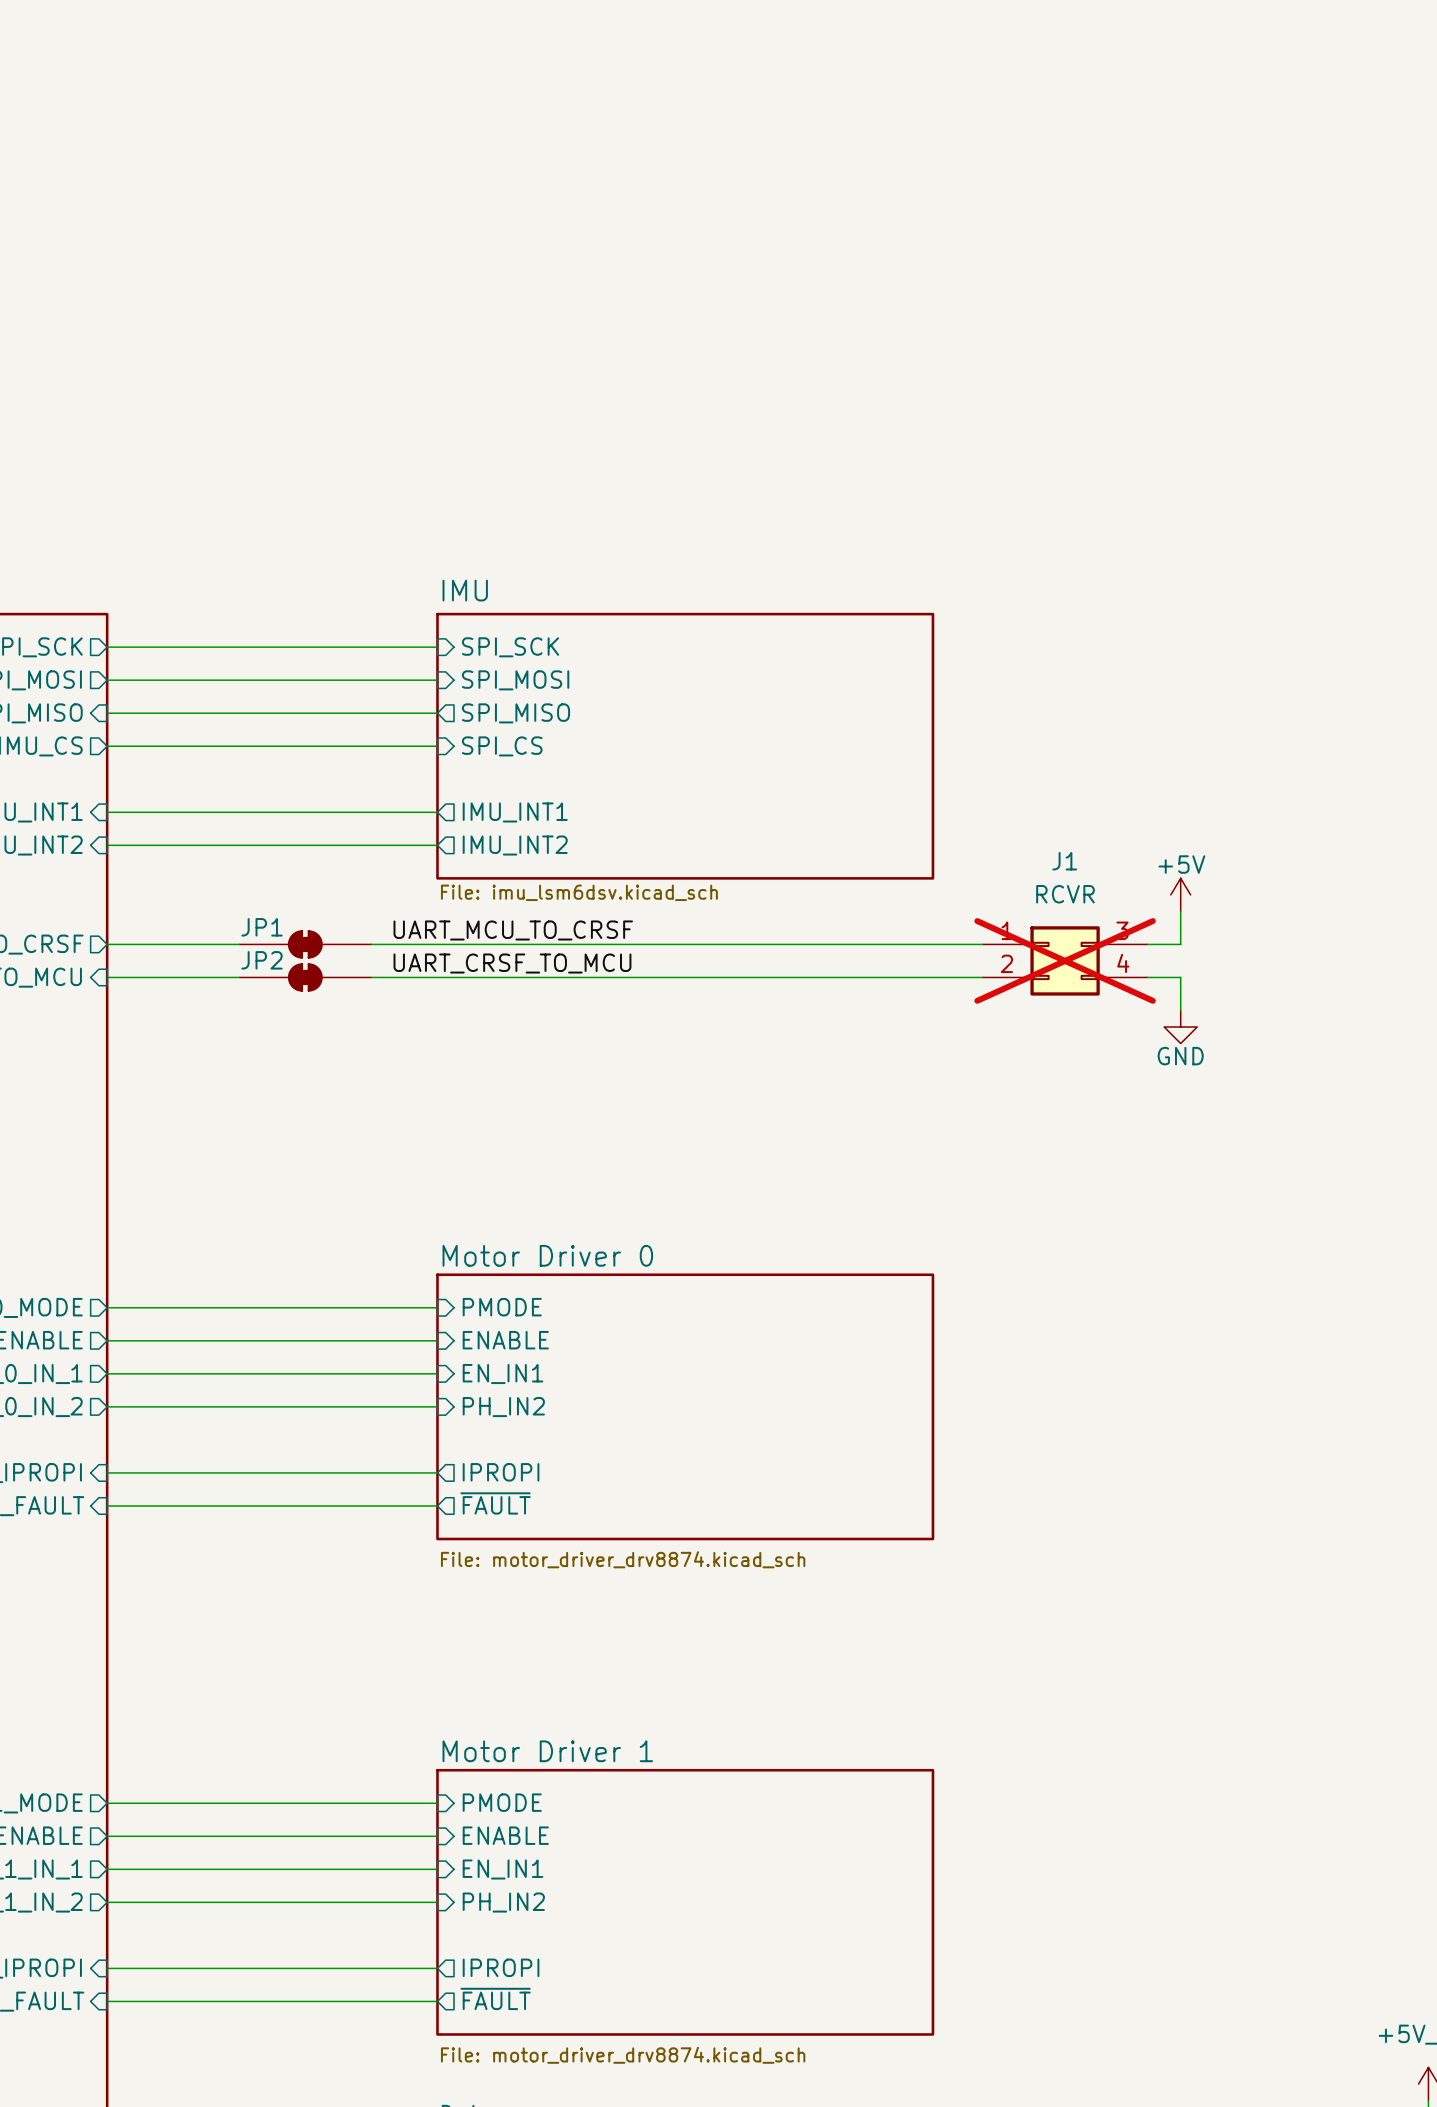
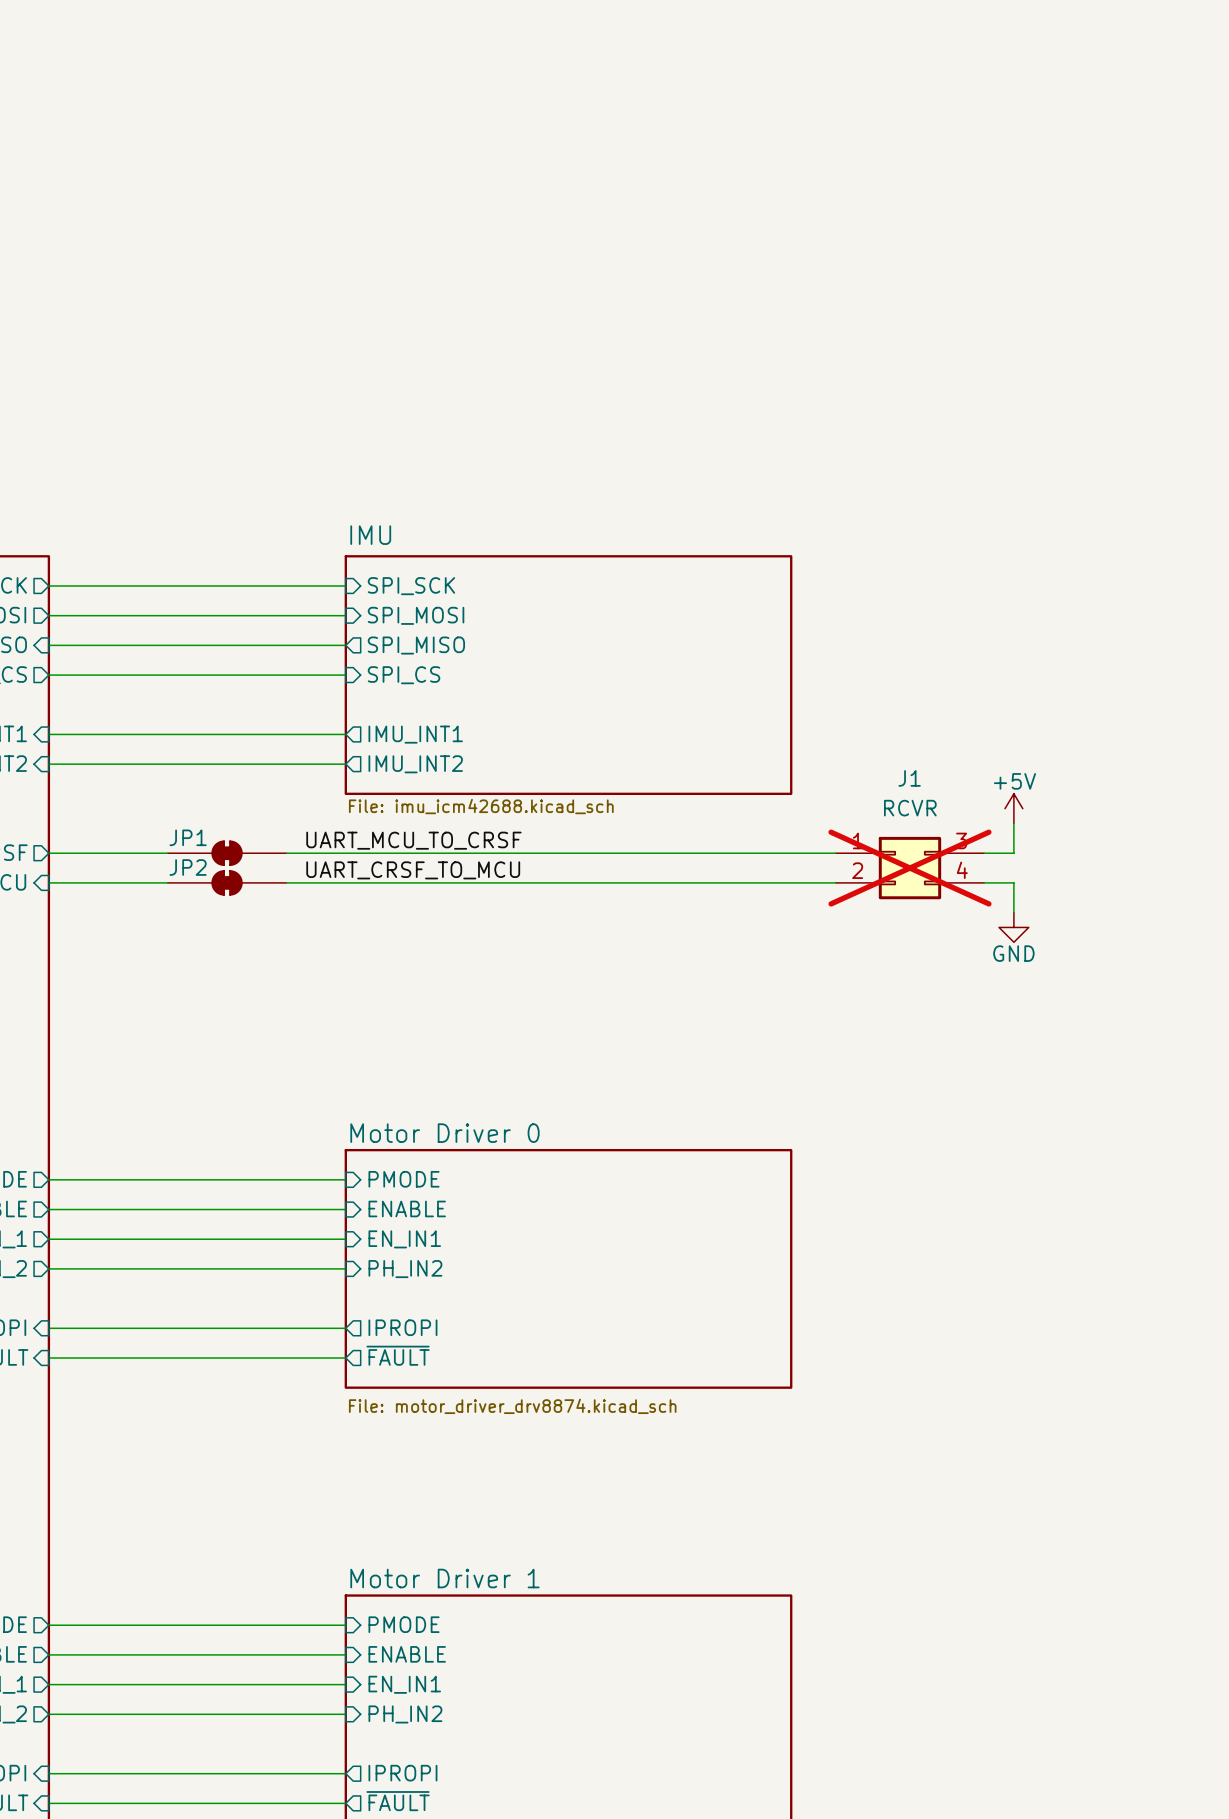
sheet IMU value: File: imu_lsm6dsv.kicad_sch (579, 892) -> File: imu_icm42688.kicad_sch (481, 806)

